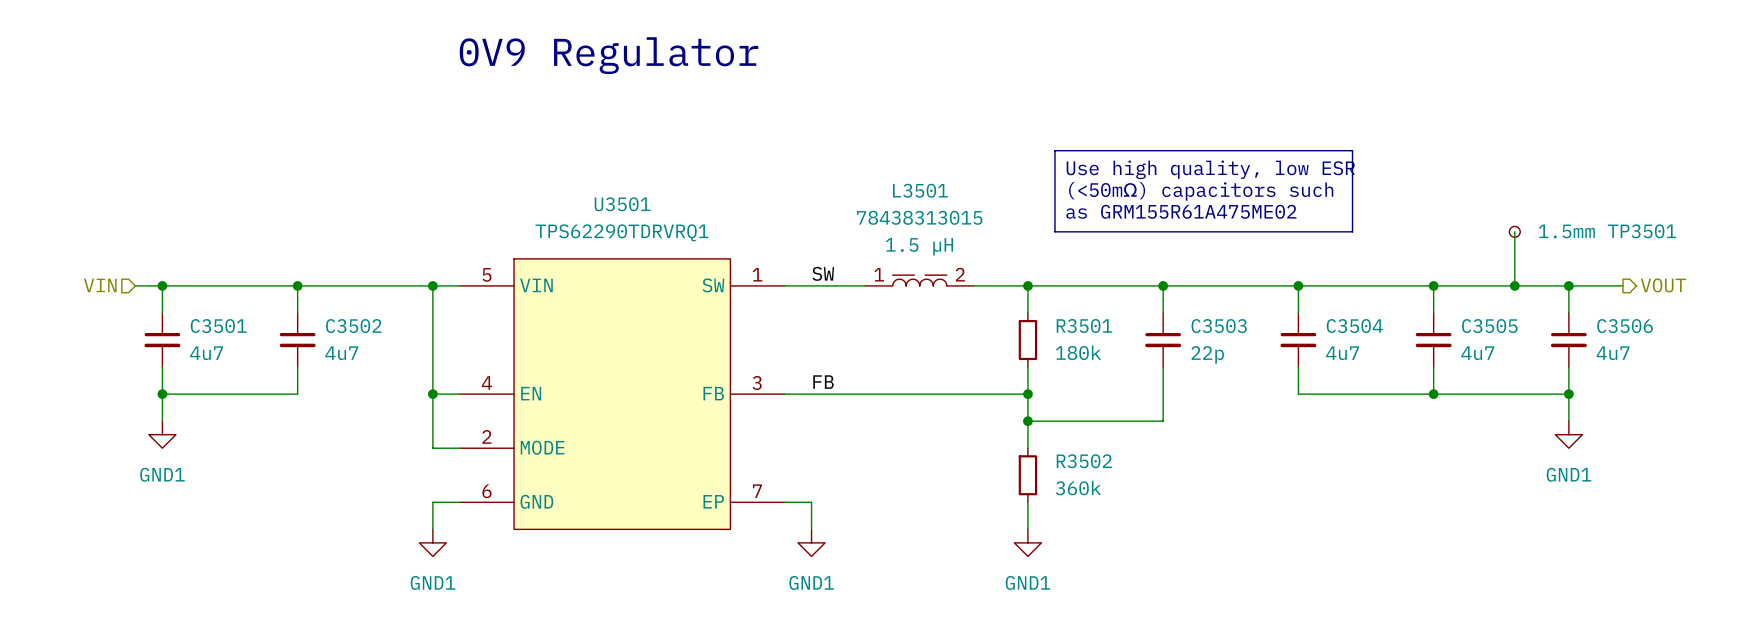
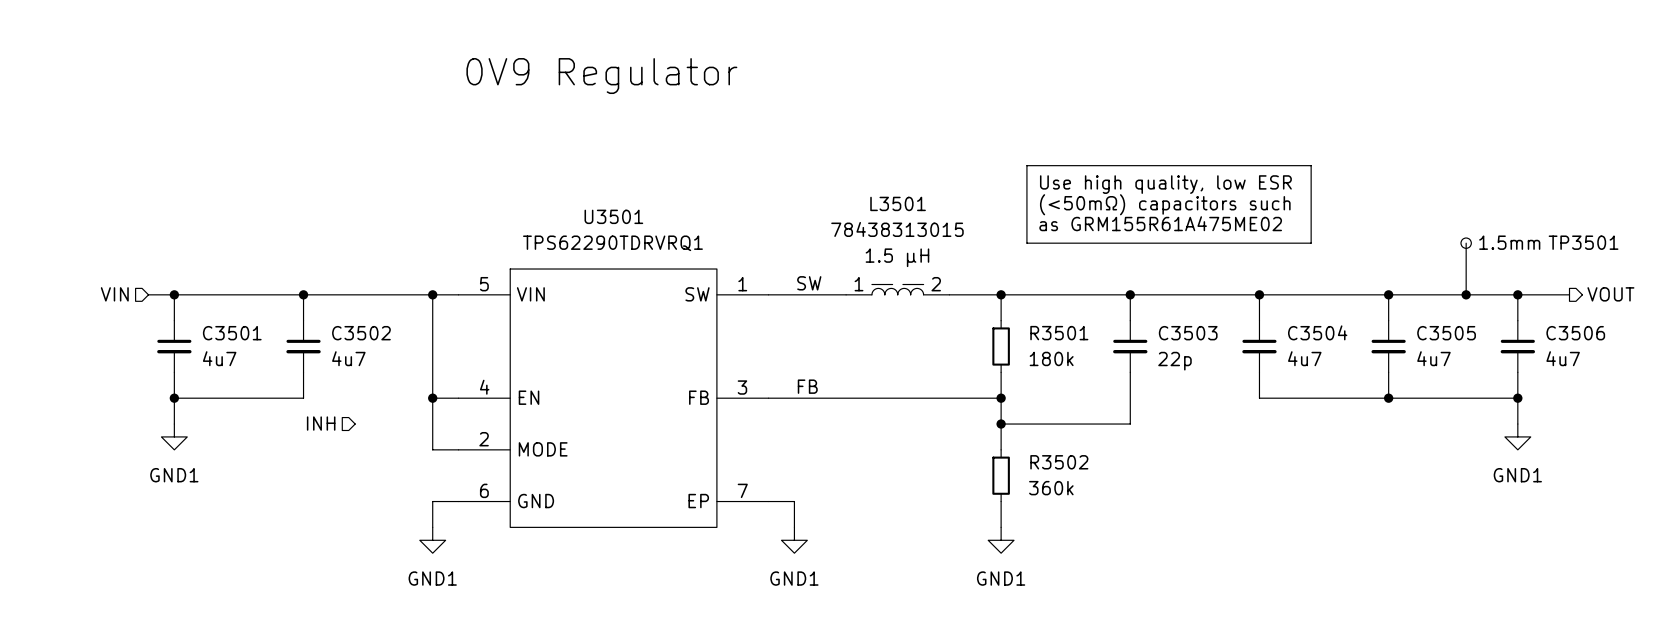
hierarchical label: none -> INH (321, 423)

